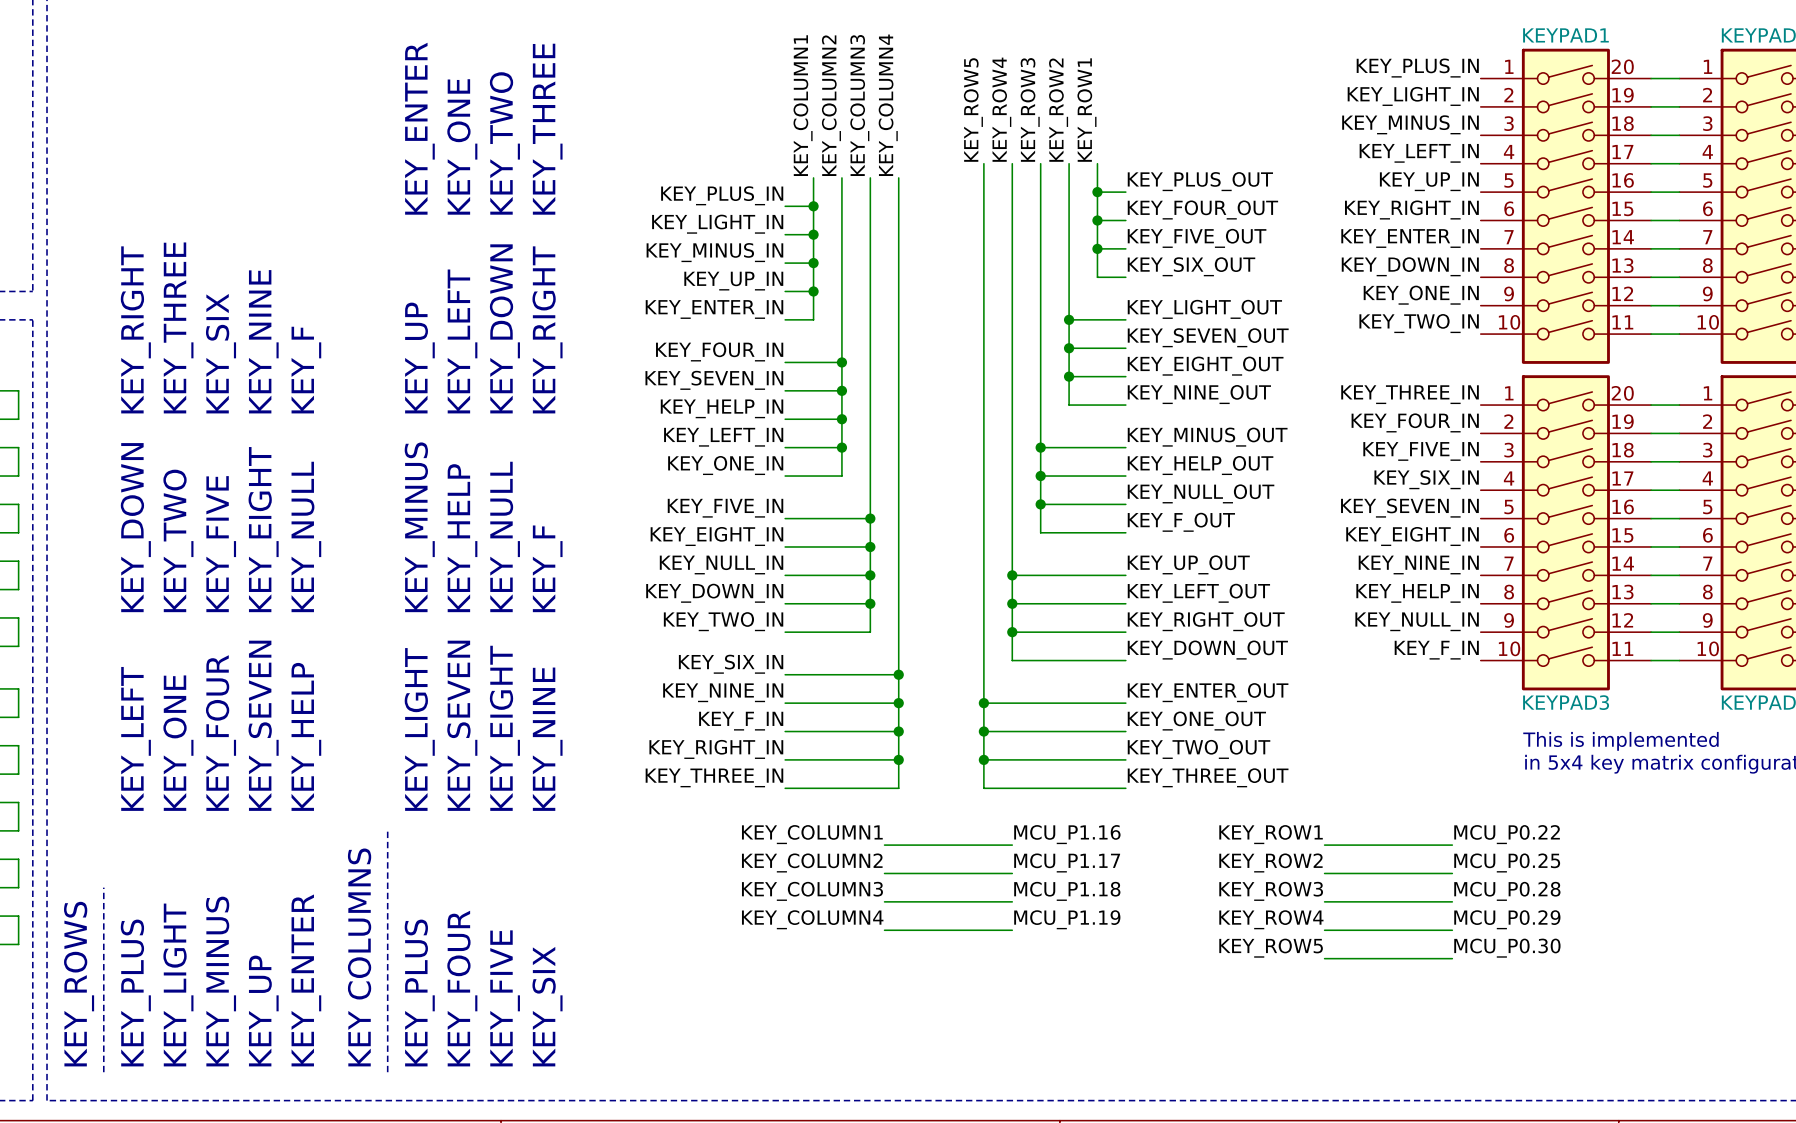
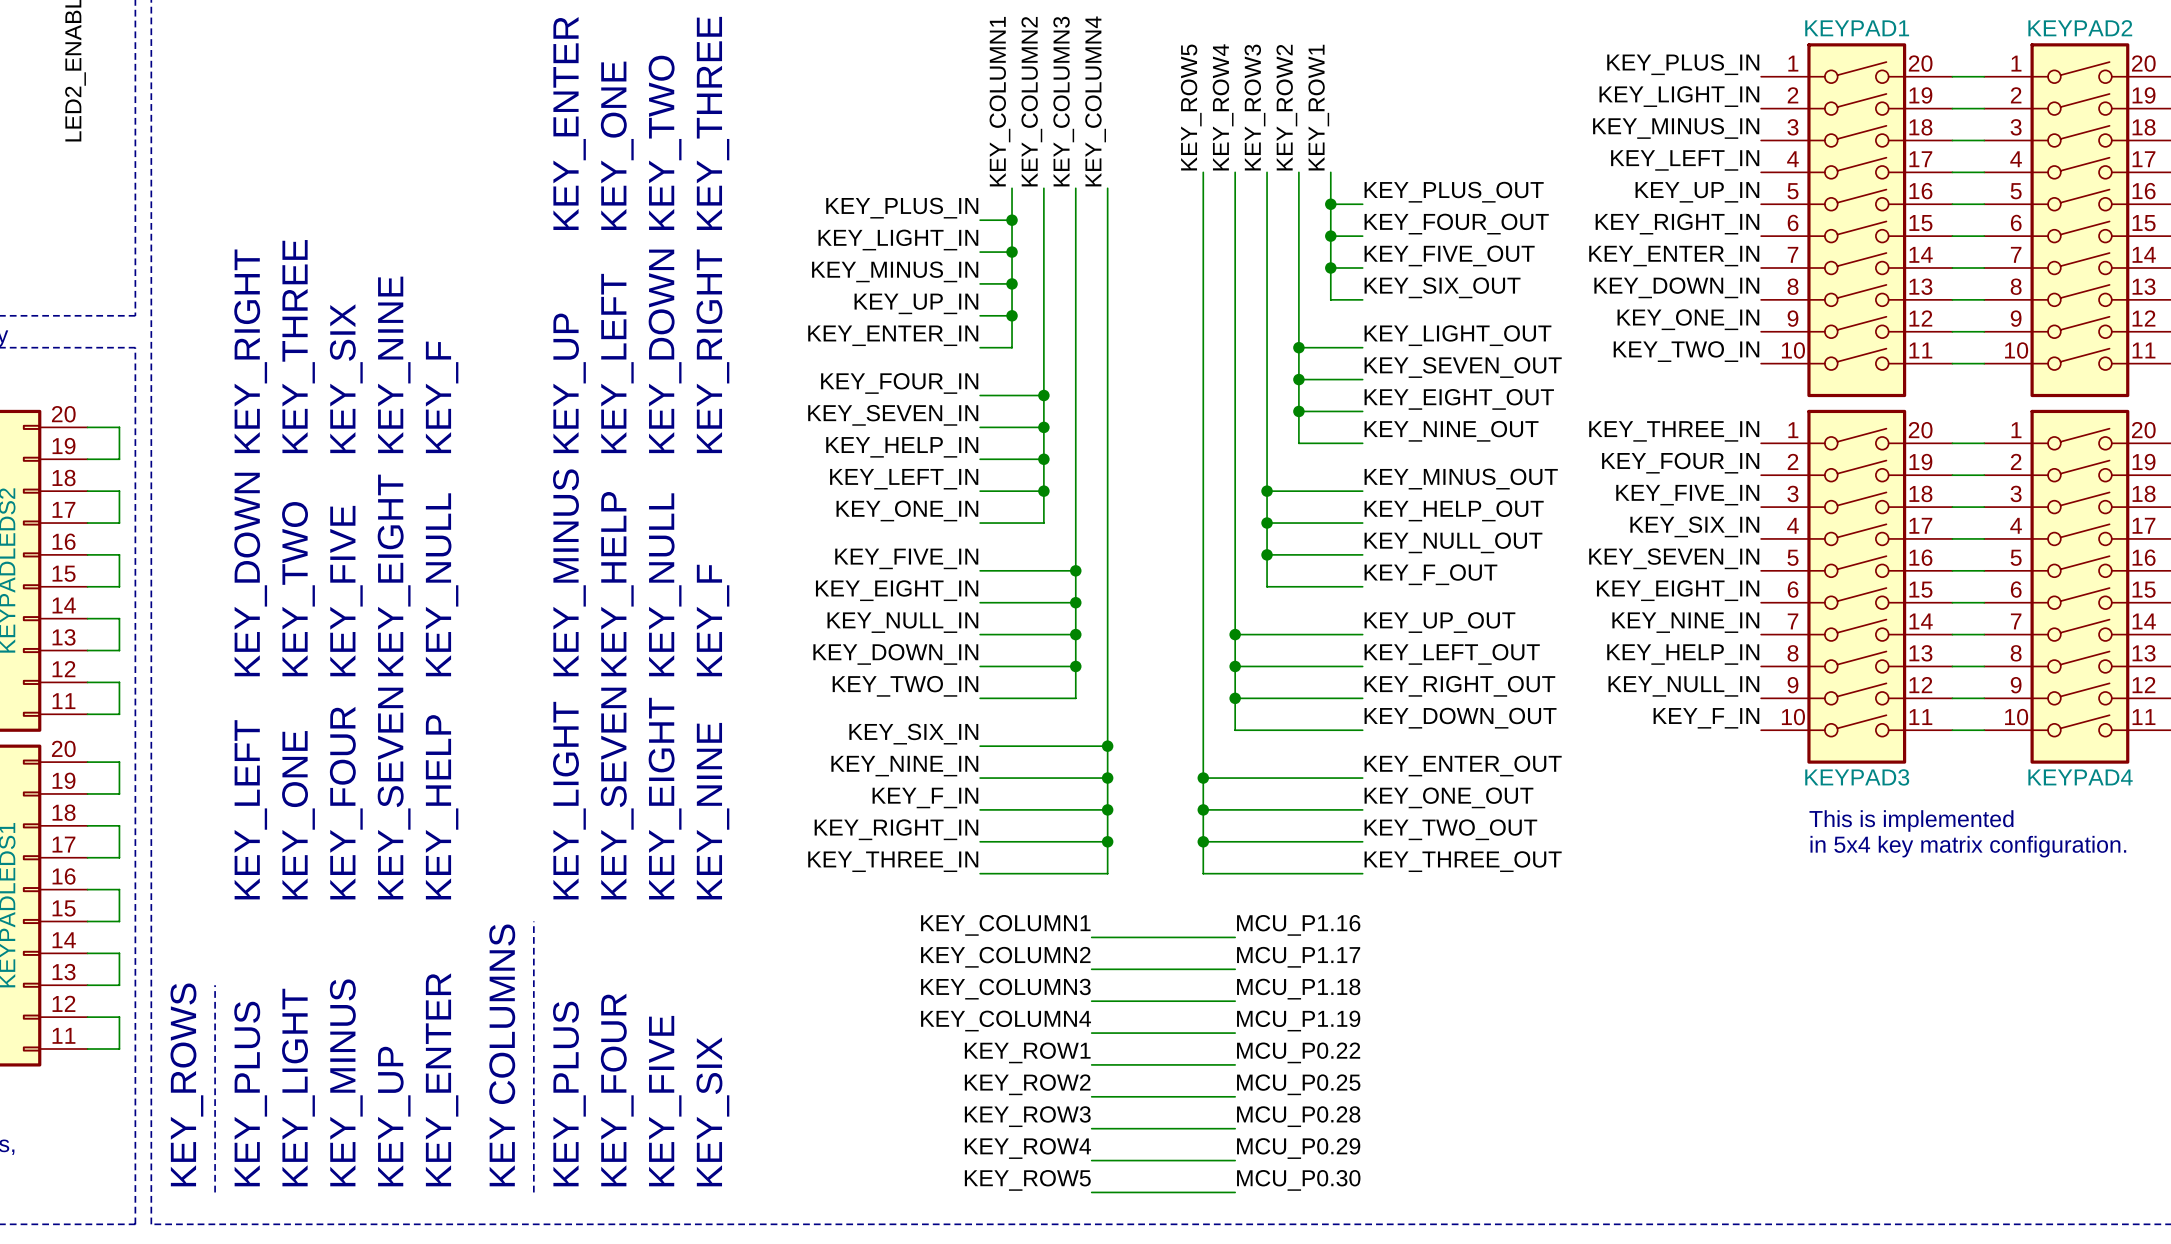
label: KEY_ROW1 (1271, 834) -> none
label: MCU_P0.22 (1507, 834) -> none
wire: (1324, 845) (1452, 845) -> none
label: KEY_ROW2 (1270, 862) -> none
label: MCU_P0.25 (1507, 862) -> none
wire: (1324, 873) (1452, 873) -> none
label: KEY_ROW3 (1271, 891) -> none
label: MCU_P0.28 (1507, 891) -> none
wire: (1324, 901) (1452, 901) -> none
label: KEY_ROW4 (1271, 919) -> none
label: MCU_P0.29 (1507, 919) -> none
wire: (1324, 930) (1452, 930) -> none
label: none -> KEY_ROW1 (1027, 1052)
label: none -> MCU_P0.22 (1298, 1052)
label: KEY_ROW5 (1271, 948) -> none
label: MCU_P0.30 (1507, 948) -> none
wire: none -> (1091, 1064) (1235, 1064)
wire: (1324, 958) (1452, 958) -> none
label: none -> KEY_ROW2 (1027, 1084)
label: none -> MCU_P0.25 (1298, 1084)
wire: none -> (1091, 1096) (1235, 1096)
label: none -> KEY_ROW3 (1027, 1116)
label: none -> MCU_P0.28 (1298, 1116)
wire: none -> (1091, 1128) (1235, 1128)
label: none -> KEY_ROW4 (1027, 1148)
label: none -> MCU_P0.29 (1298, 1148)
wire: none -> (1091, 1160) (1235, 1160)
label: none -> KEY_ROW5 (1027, 1180)
label: none -> MCU_P0.30 (1298, 1180)
wire: none -> (1091, 1192) (1235, 1192)

